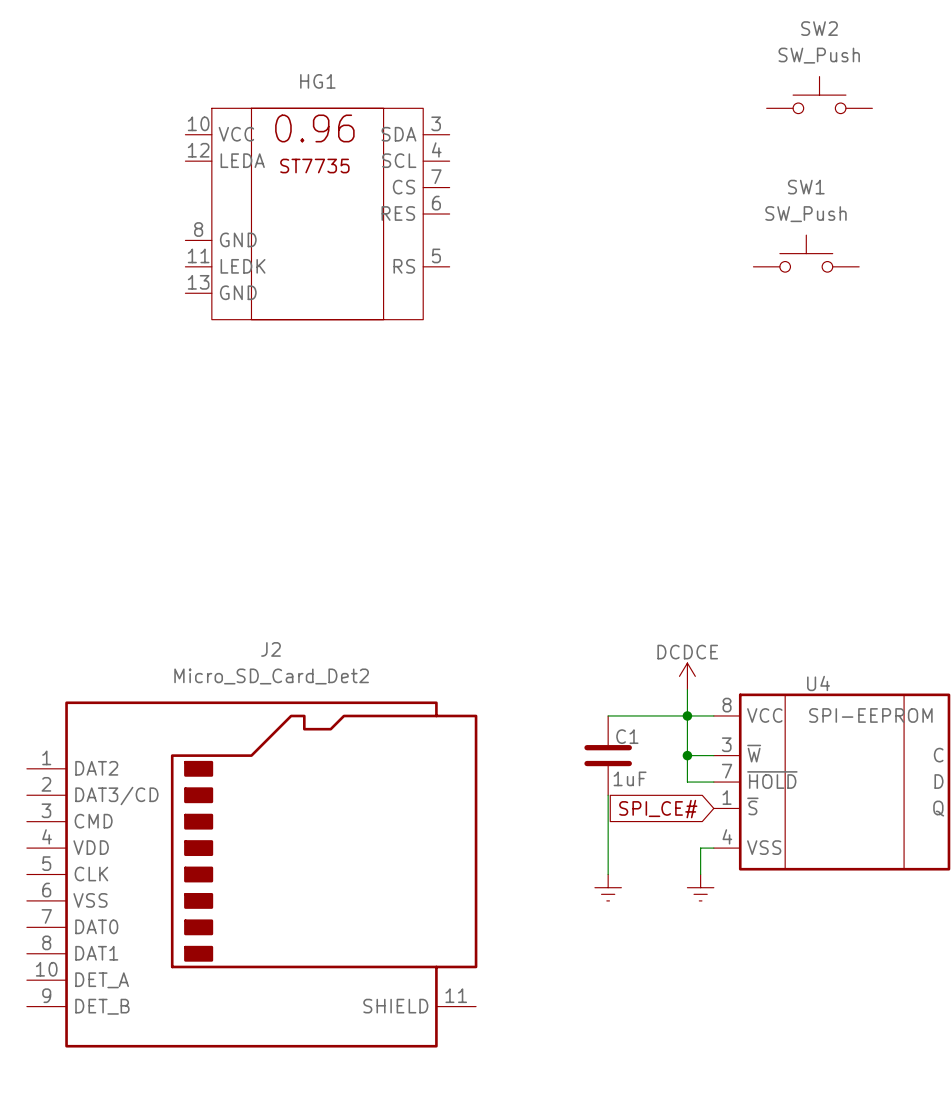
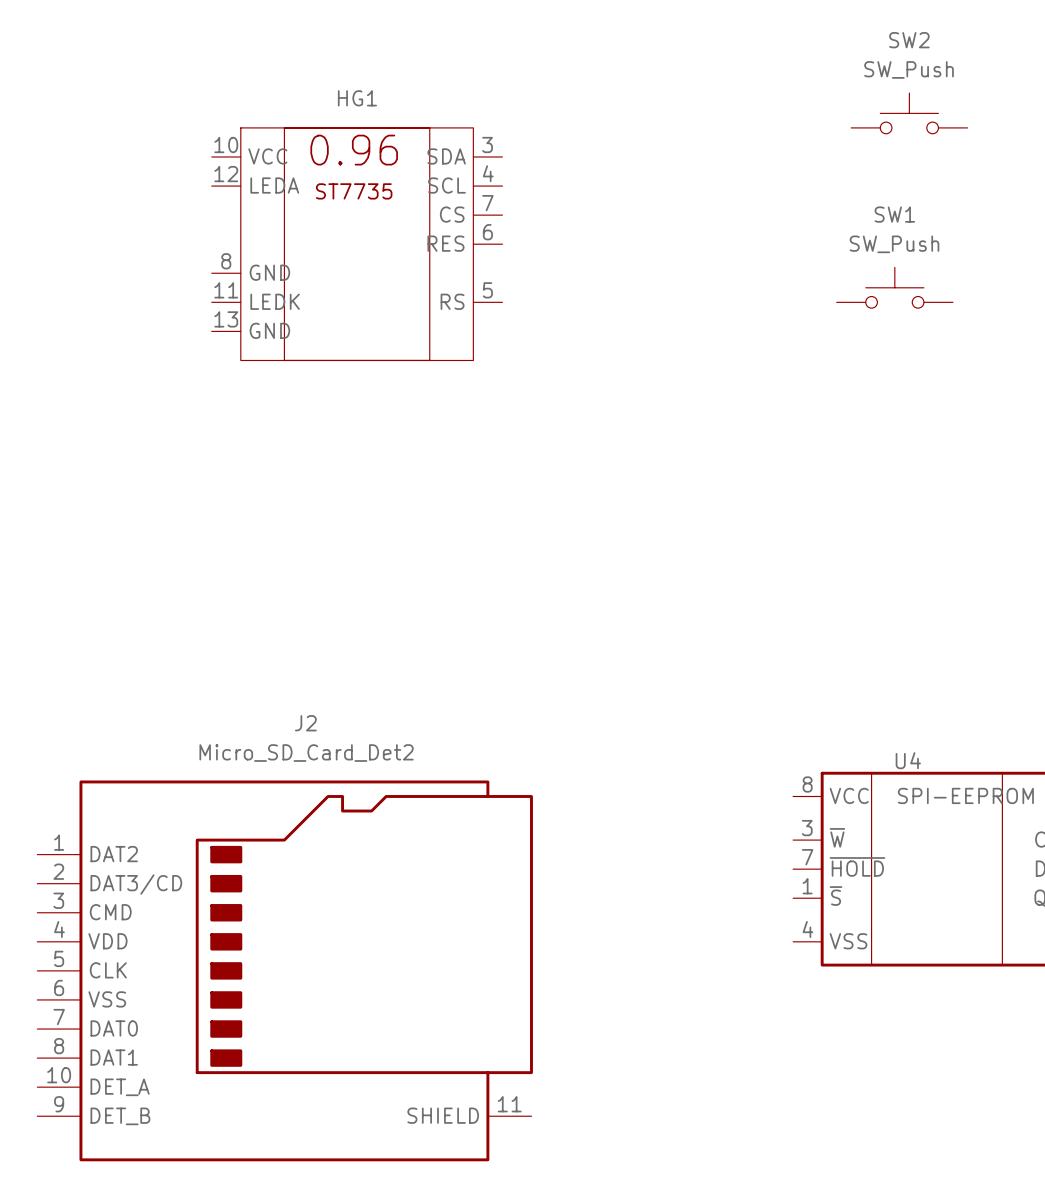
power symbol: DCDCE (687, 676) -> none
wire: (687, 689) (687, 782) (713, 782) -> none
wire: (608, 715) (713, 715) -> none
junction: (687, 715) -> none
C1: 1uF (608, 755) -> none
wire: (687, 755) (713, 755) -> none
junction: (687, 755) -> none
wire: (608, 795) (608, 874) -> none
global label: SPI_CE# (658, 809) -> none
wire: (713, 848) (700, 848) (700, 874) -> none
power symbol: (608, 887) -> none
power symbol: (700, 887) -> none

